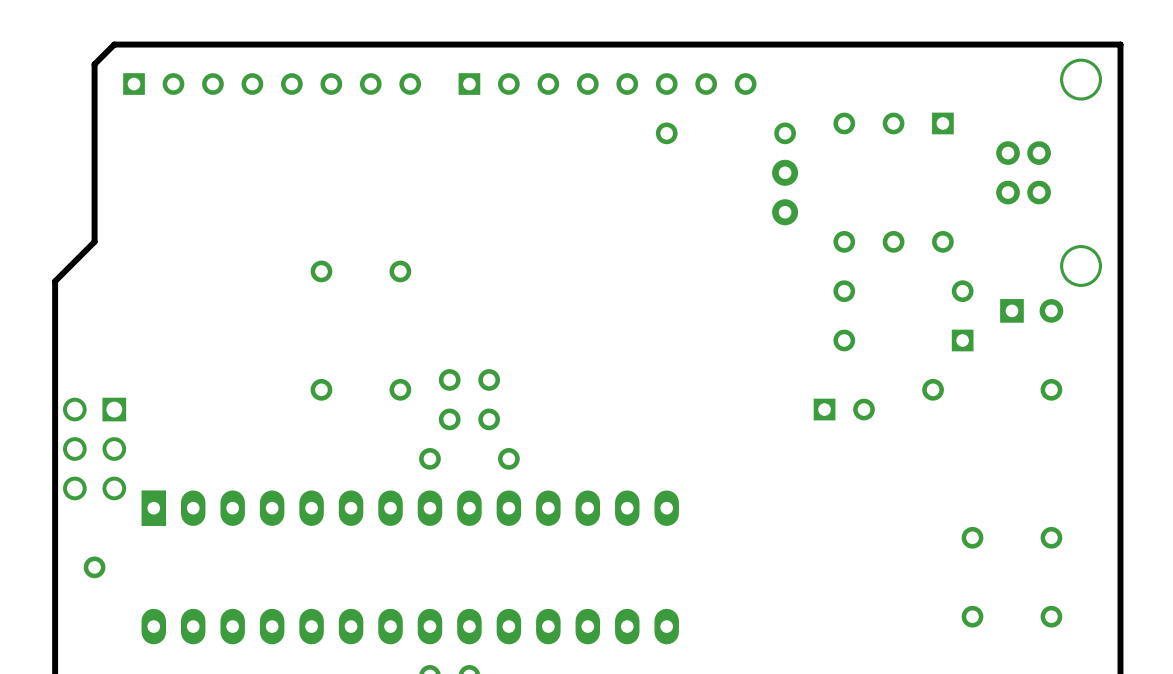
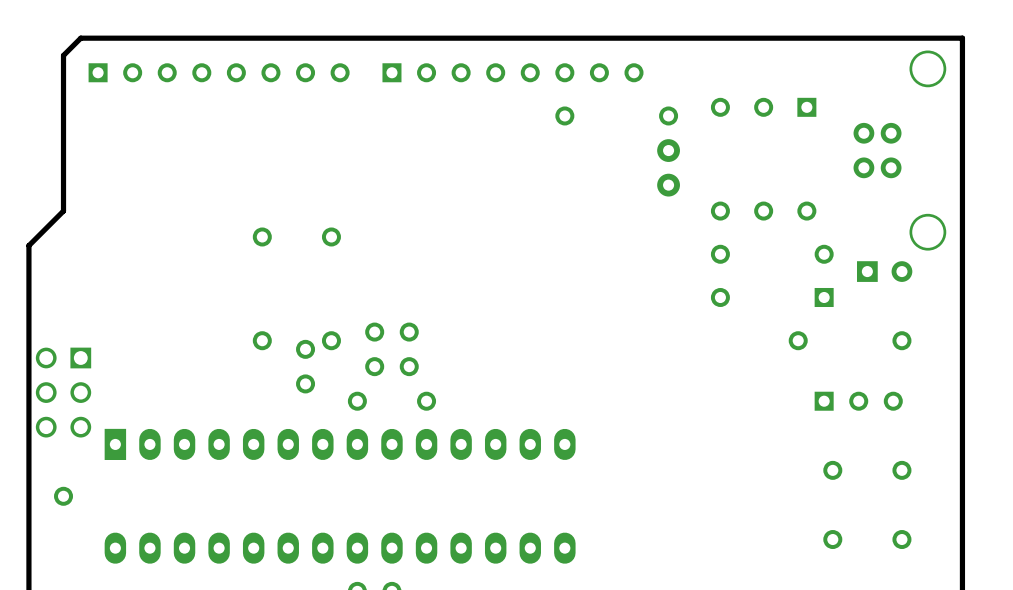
part: (844, 409) -> none
part: none -> (305, 366)
part: none -> (858, 401)

